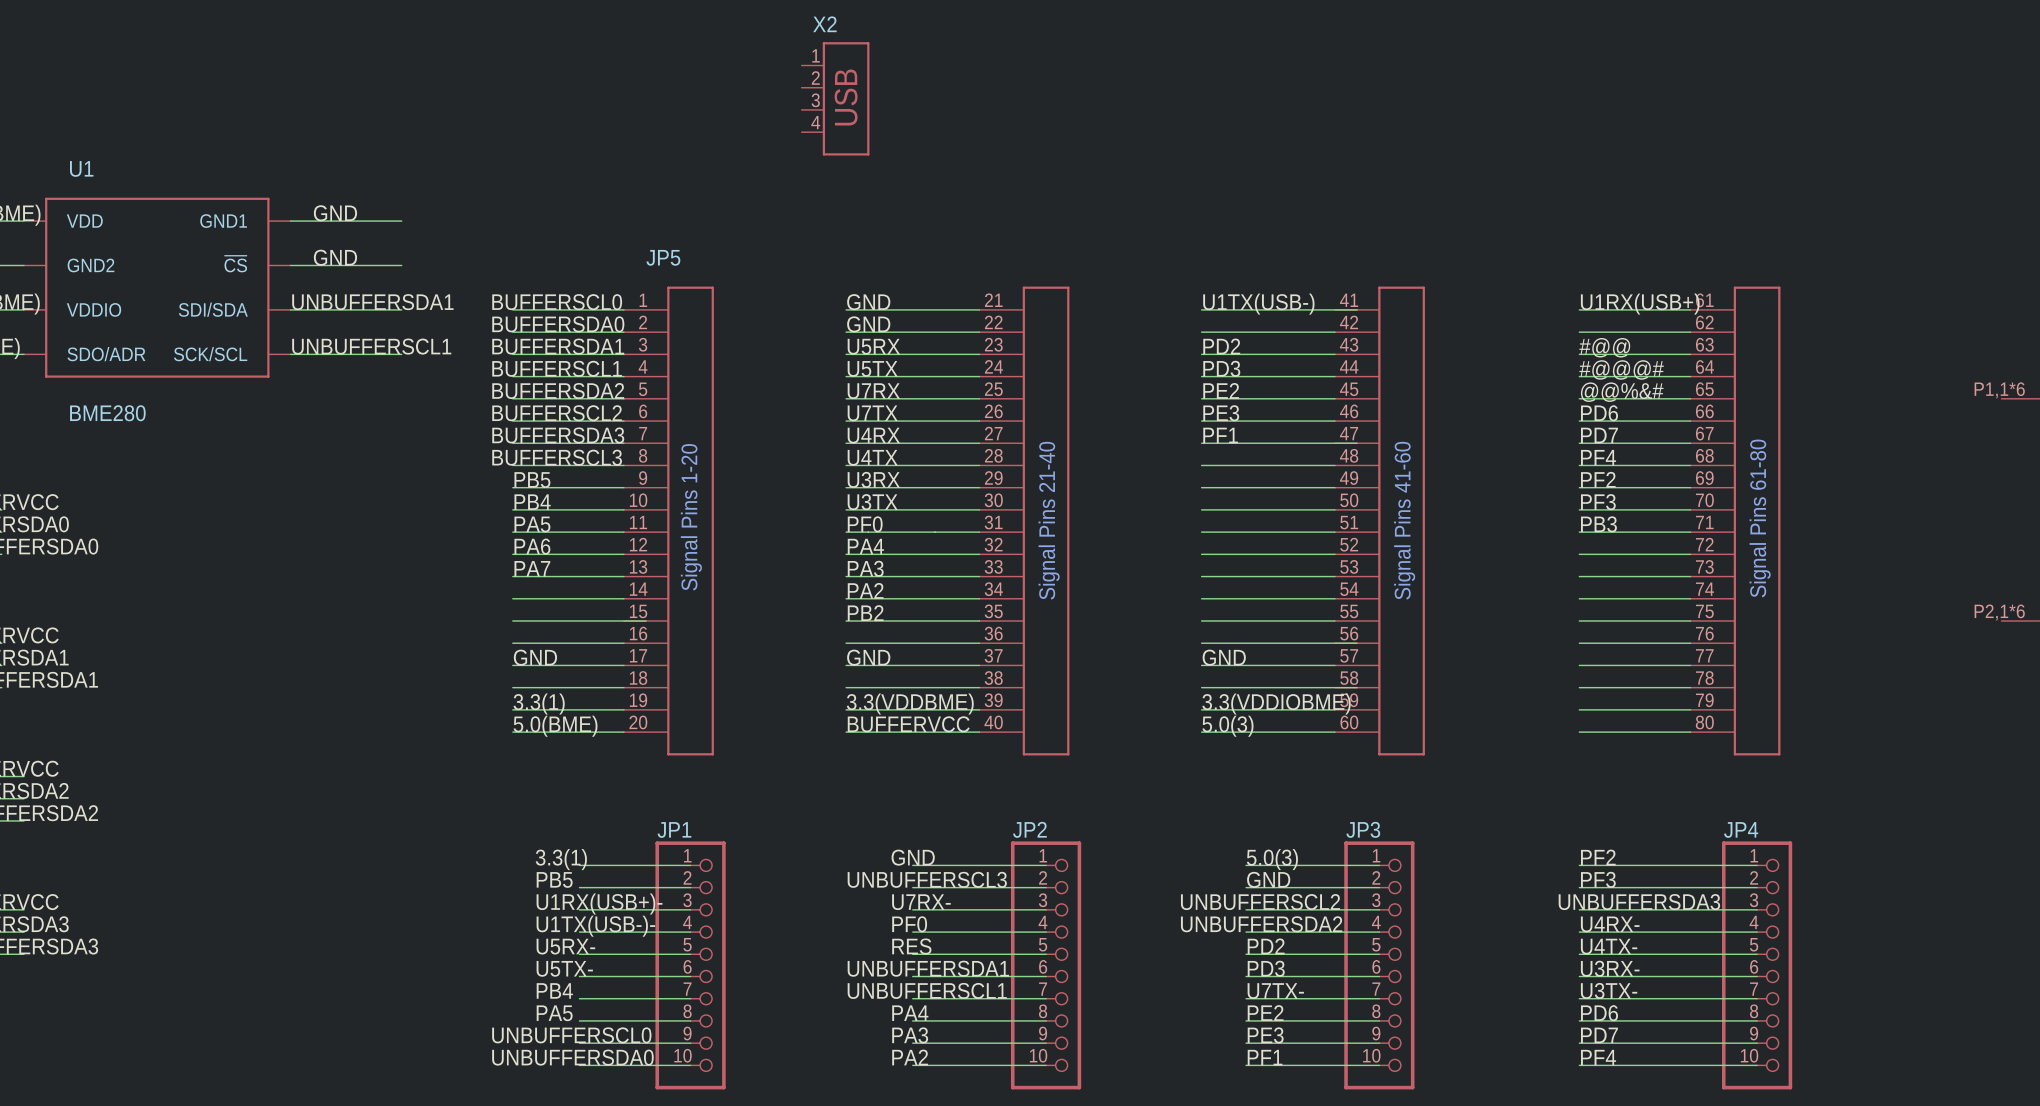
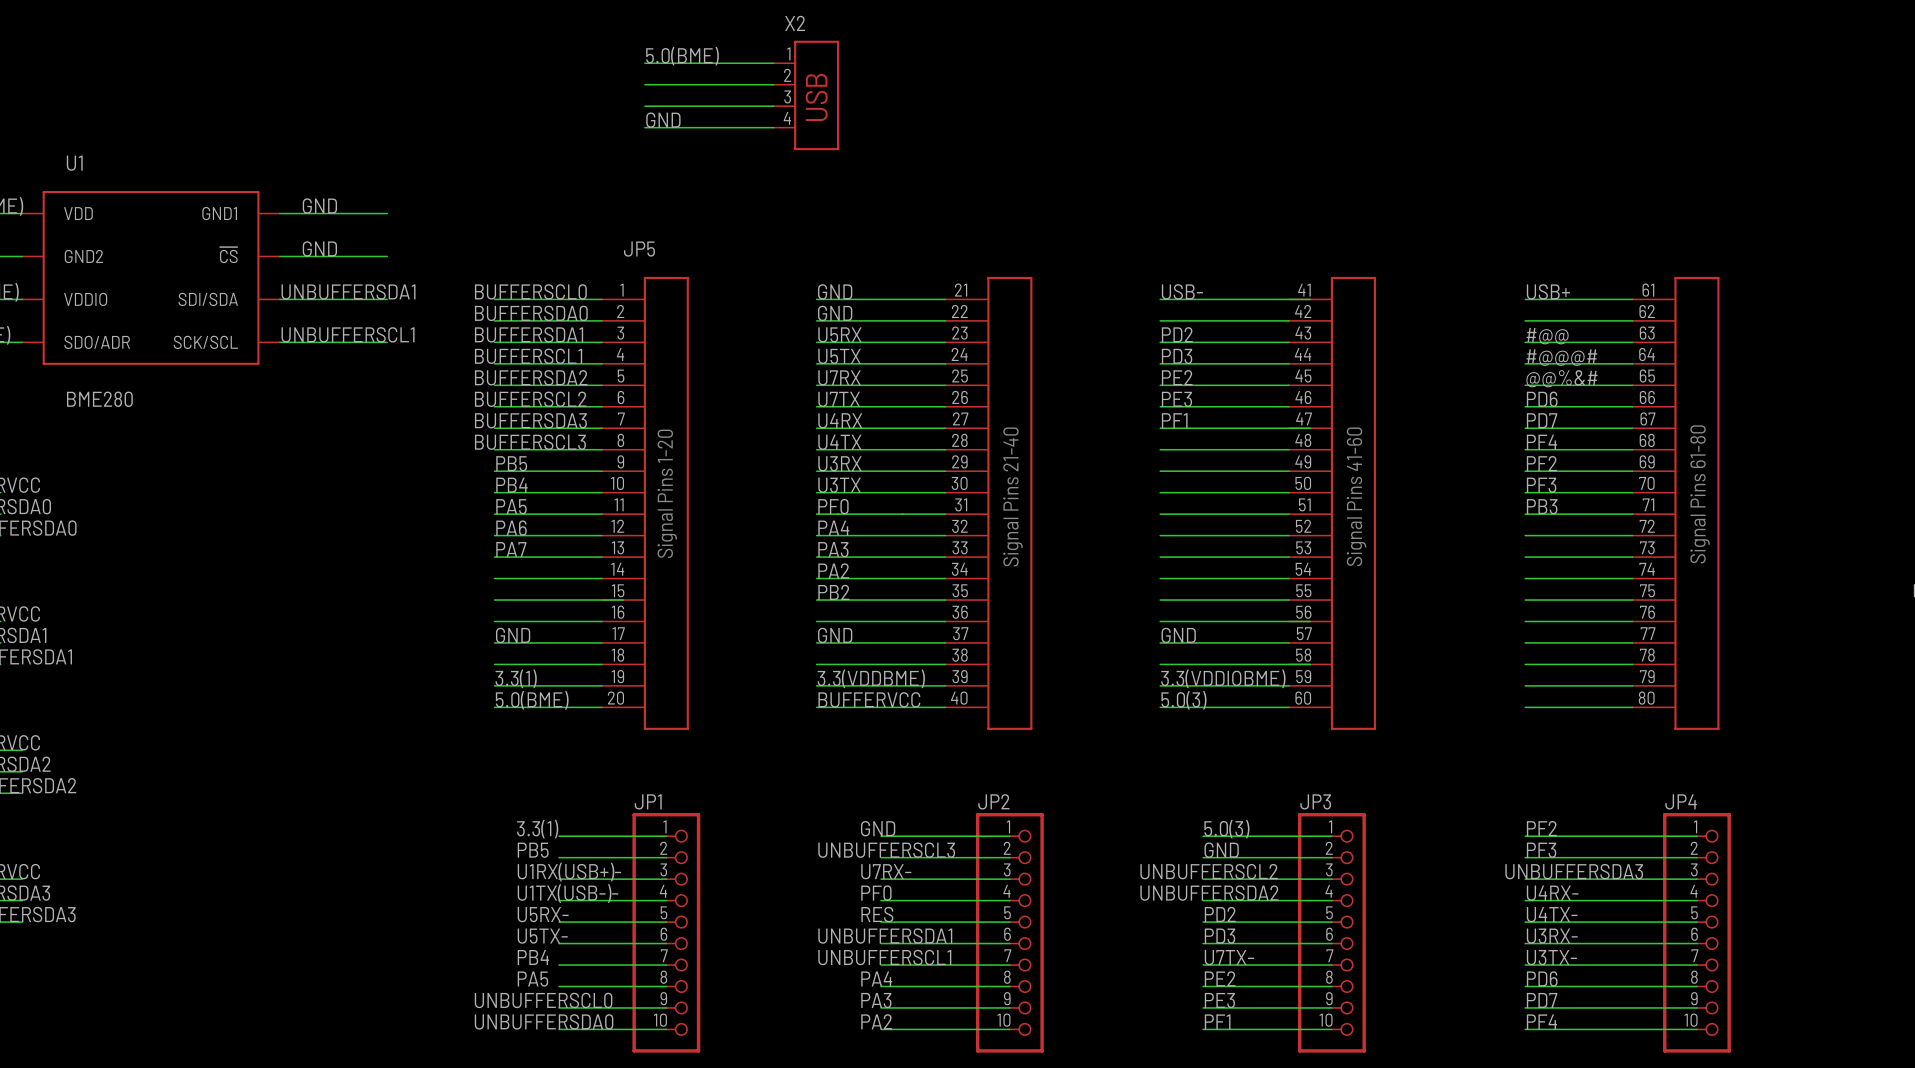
label: none -> 5.0(BME) (682, 56)
wire: none -> (644, 63) (773, 63)
wire: none -> (644, 84) (773, 84)
wire: none -> (644, 106) (773, 106)
label: none -> GND (663, 120)
wire: none -> (644, 127) (773, 127)
label: U1TX(USB-) (1258, 304) -> USB- (1182, 291)
label: U1RX(USB+) (1640, 304) -> USB+ (1548, 291)

